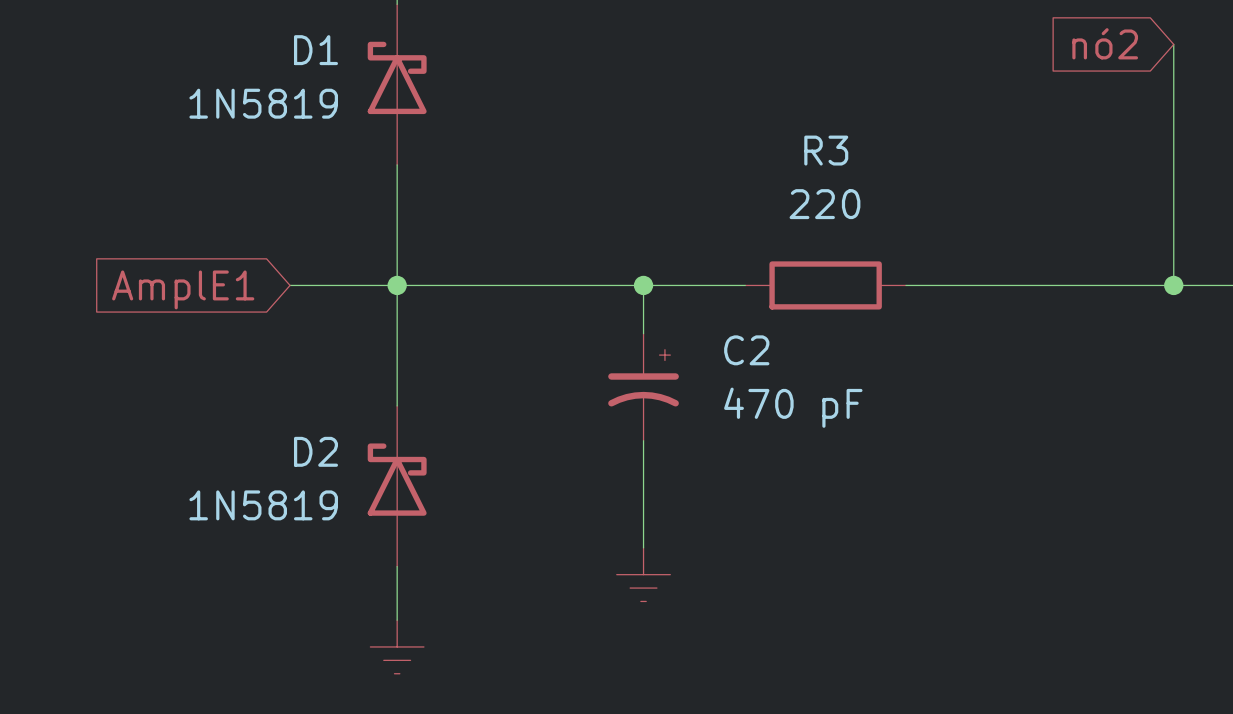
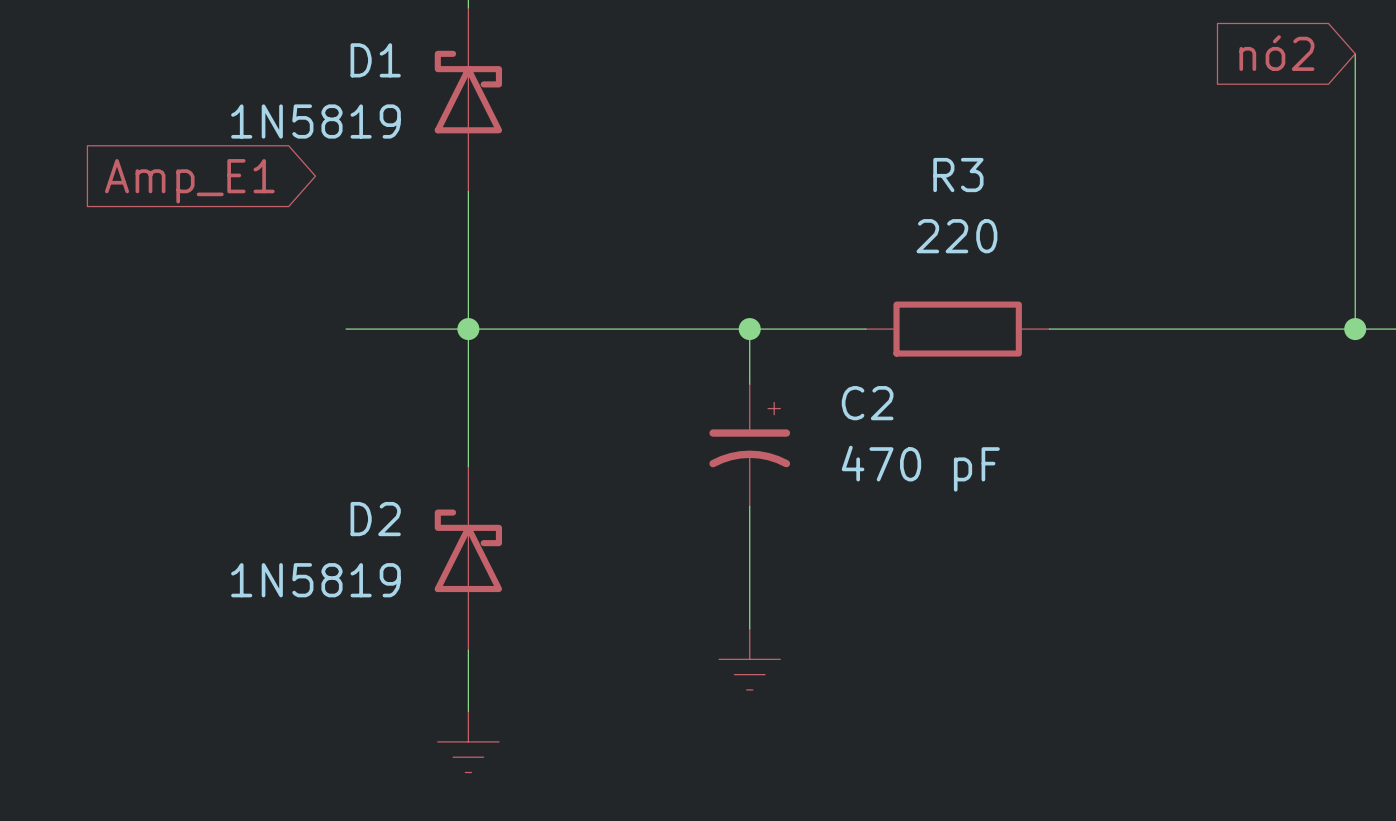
global label: none -> Amp_E1 (189, 181)
global label: AmplE1 (183, 289) -> none

